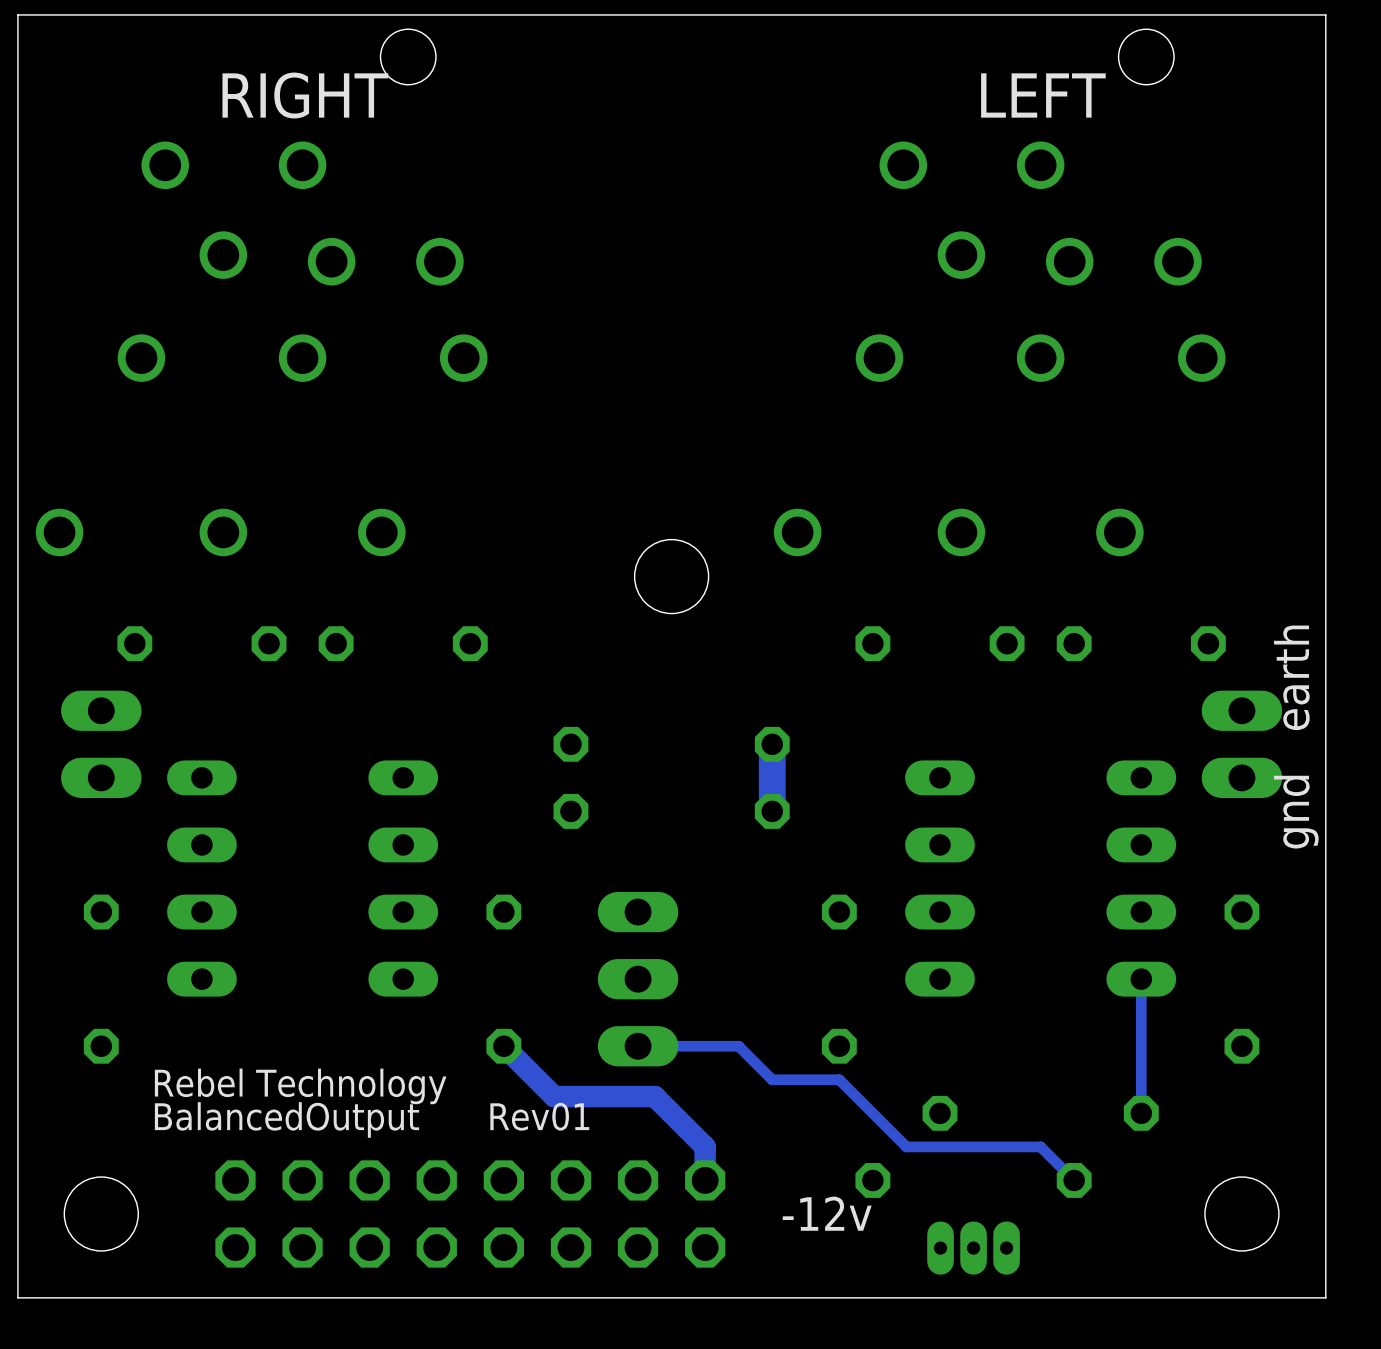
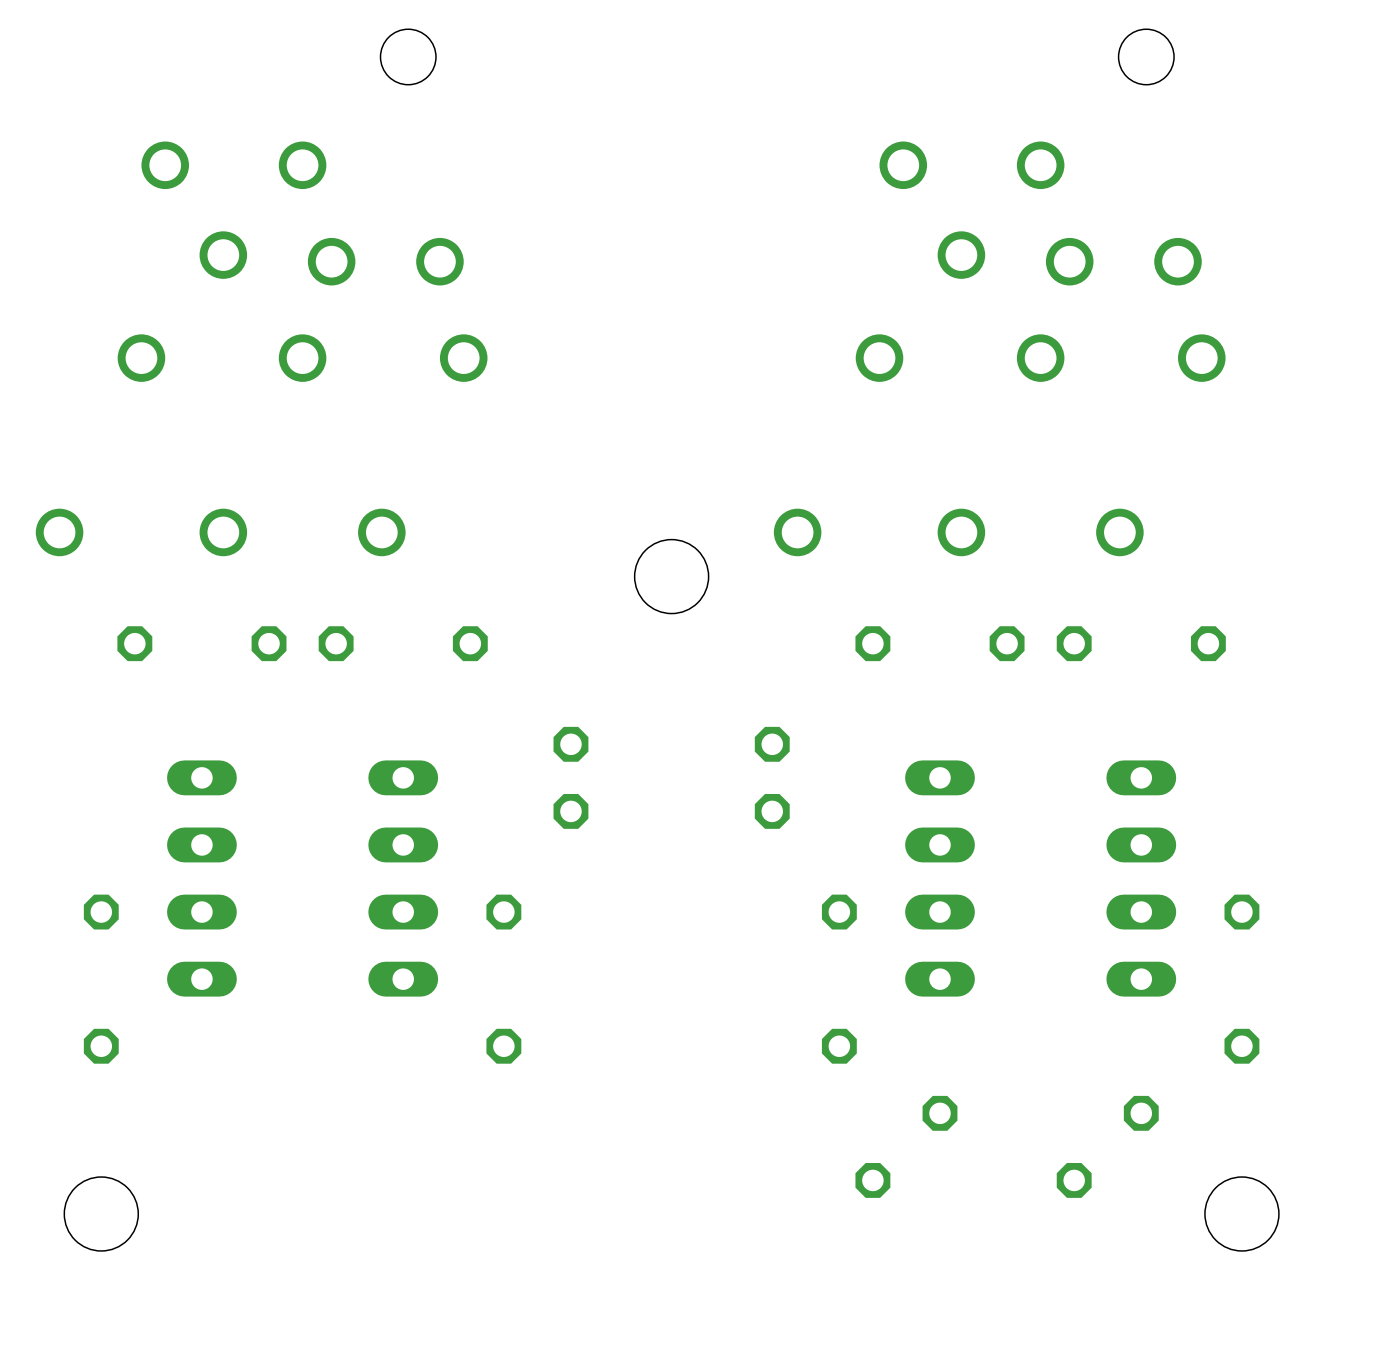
board edge: (1325, 14) (17, 14) (17, 1297) (1325, 1297) (1325, 14) -> none
text: RIGHT (305, 95) -> none
text: LEFT (1043, 95) -> none
text: earth (1291, 677) -> none
part: (101, 744) -> none
track: (772, 744) (772, 811) -> none
part: (1241, 744) -> none
text: gnd (1296, 812) -> none
part: (638, 979) -> none
track: (1141, 979) (1141, 1113) -> none
track: (503, 1046) (554, 1096) (654, 1096) (705, 1146) (705, 1180) -> none
track: (638, 1046) (738, 1046) (772, 1079) (839, 1079) (906, 1146) (1040, 1146) (1074, 1180) -> none
text: Rebel Technology (300, 1086) -> none
text: Rev01 (539, 1116) -> none
text: BalancedOutput (286, 1119) -> none
part: (470, 1213) -> none
text: -12v (827, 1213) -> none
part: (973, 1248) -> none

